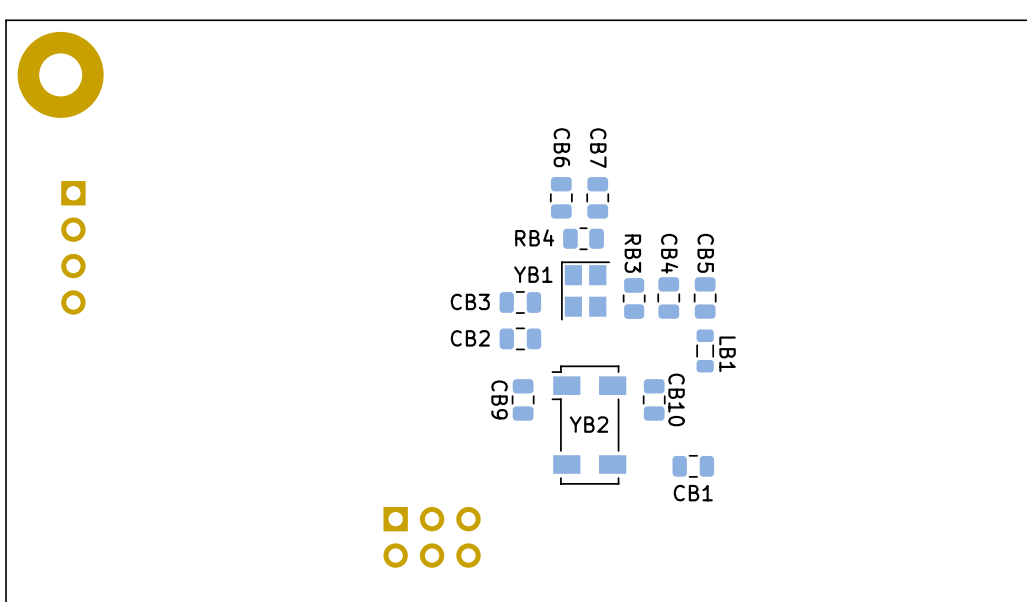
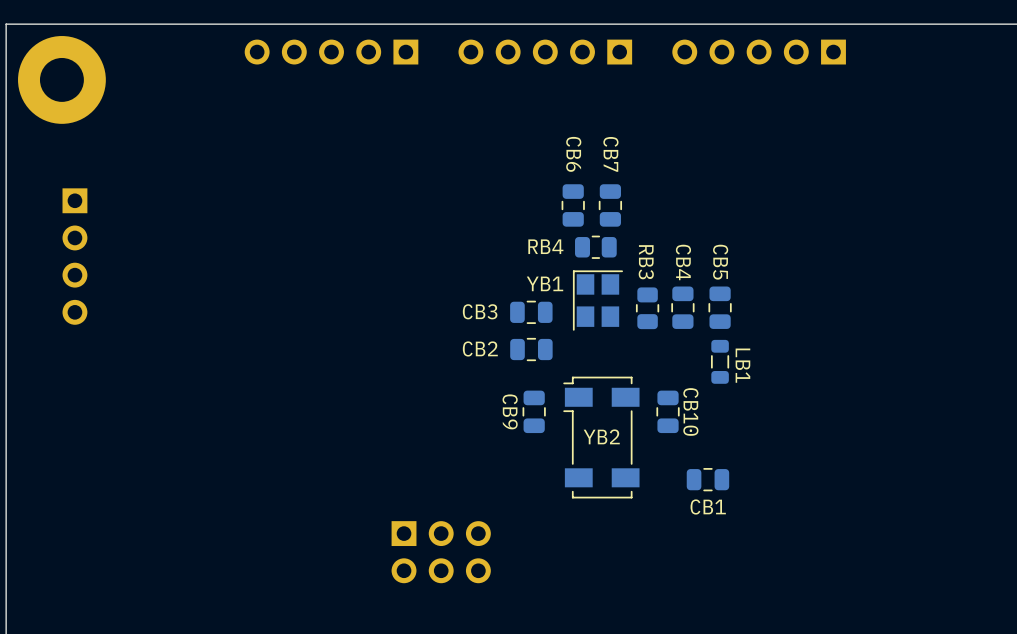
part: none -> (331, 52)
part: none -> (545, 52)
part: none -> (759, 52)

